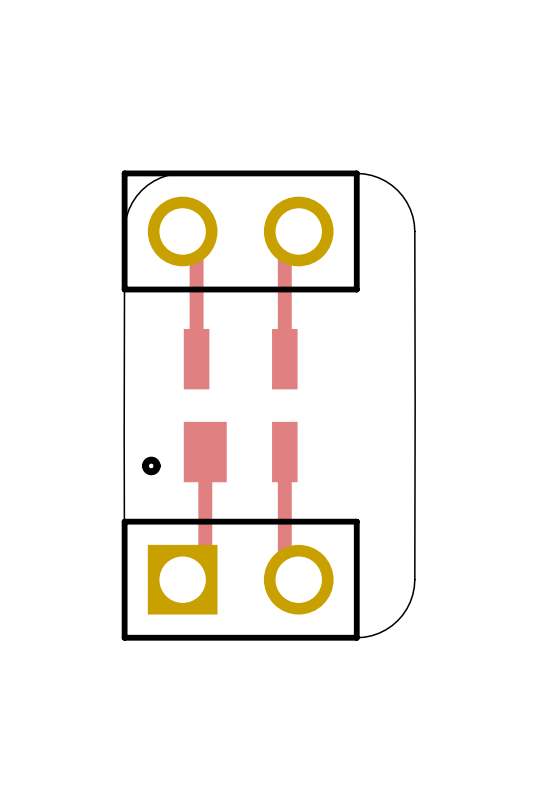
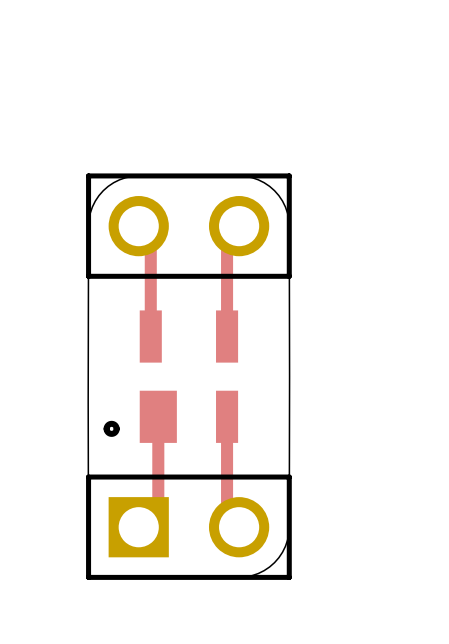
board edge: (298, 173) (356, 173) (378, 177) (392, 185) (402, 196) (410, 209) (414, 223) (414, 587) (406, 608) (392, 625) (371, 635) (356, 637) -> (239, 175) (252, 177) (269, 186) (278, 195) (287, 213) (289, 226) (289, 376) (289, 527) (287, 540) (278, 557) (269, 566) (252, 575) (239, 577)

